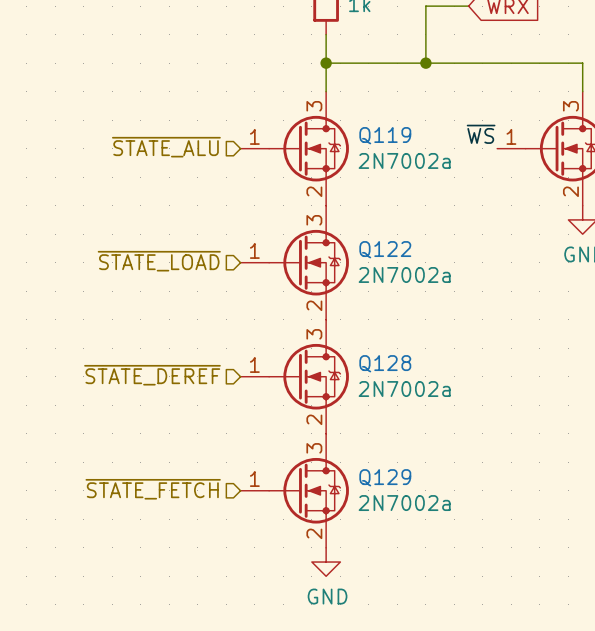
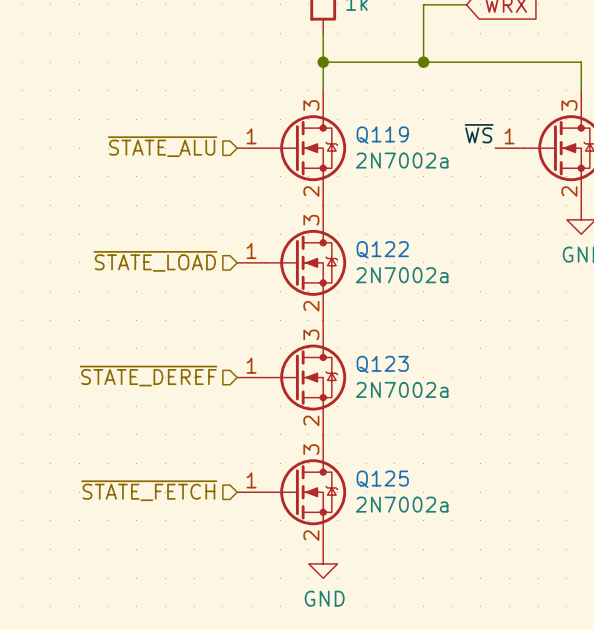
Q128 name: Q128 (385, 363) -> Q123 (382, 364)
Q129 name: Q129 (385, 477) -> Q125 (382, 479)

